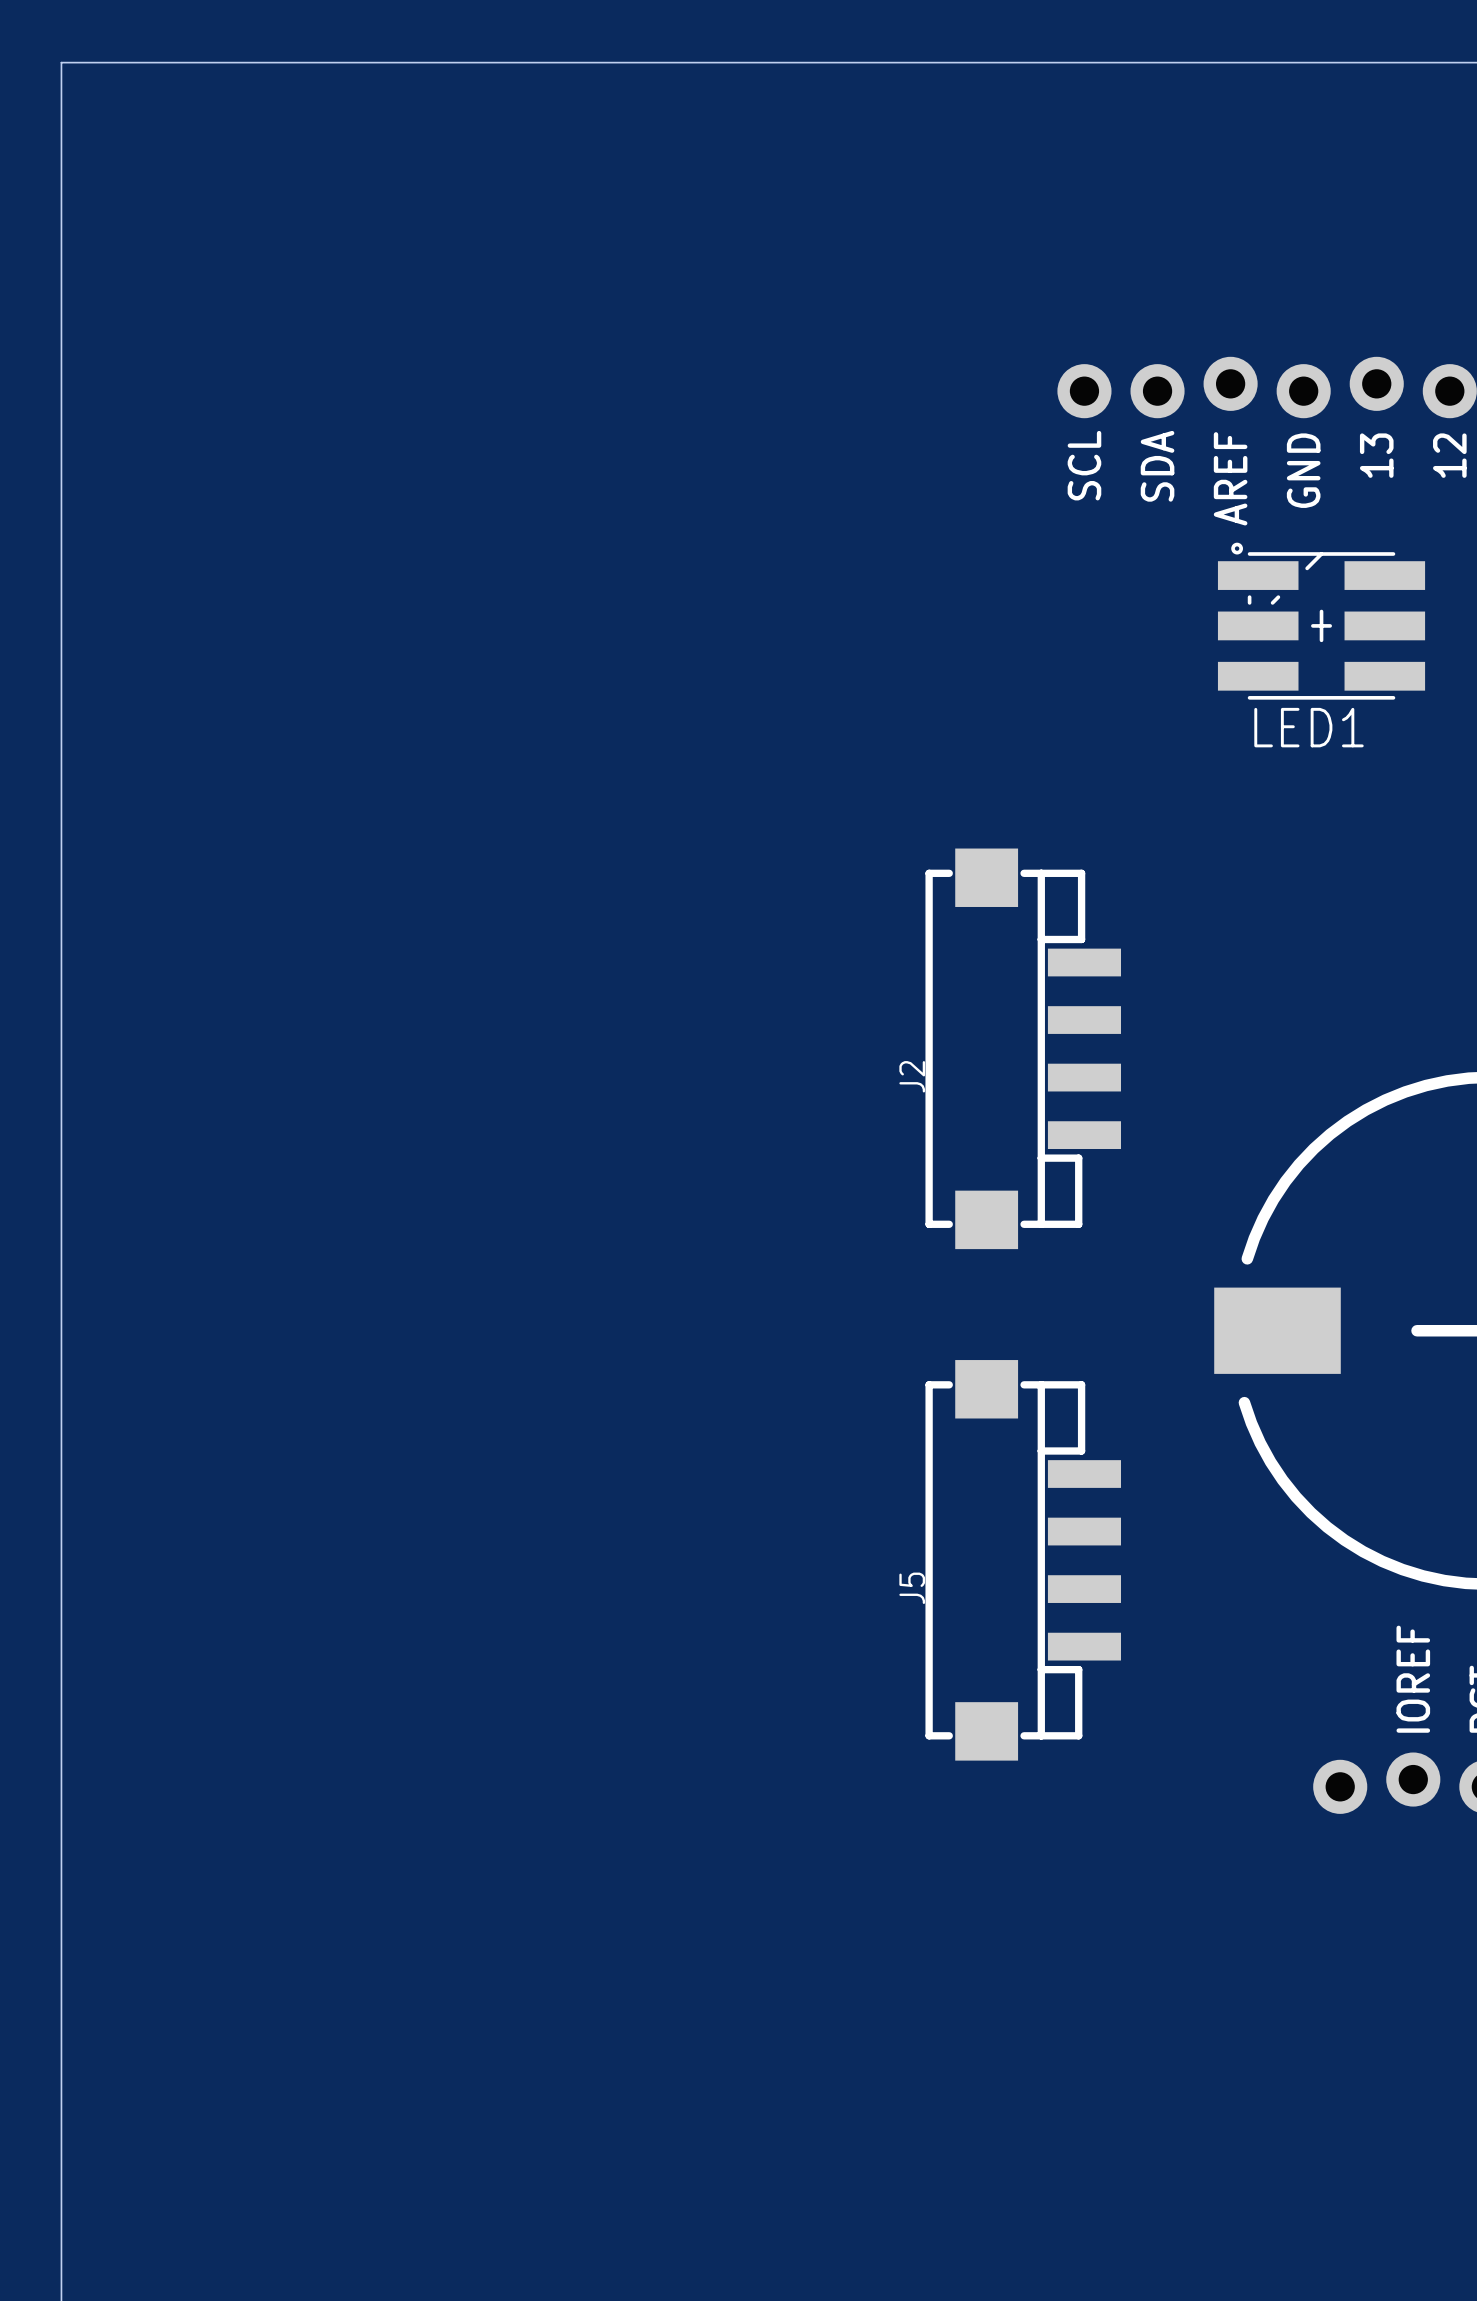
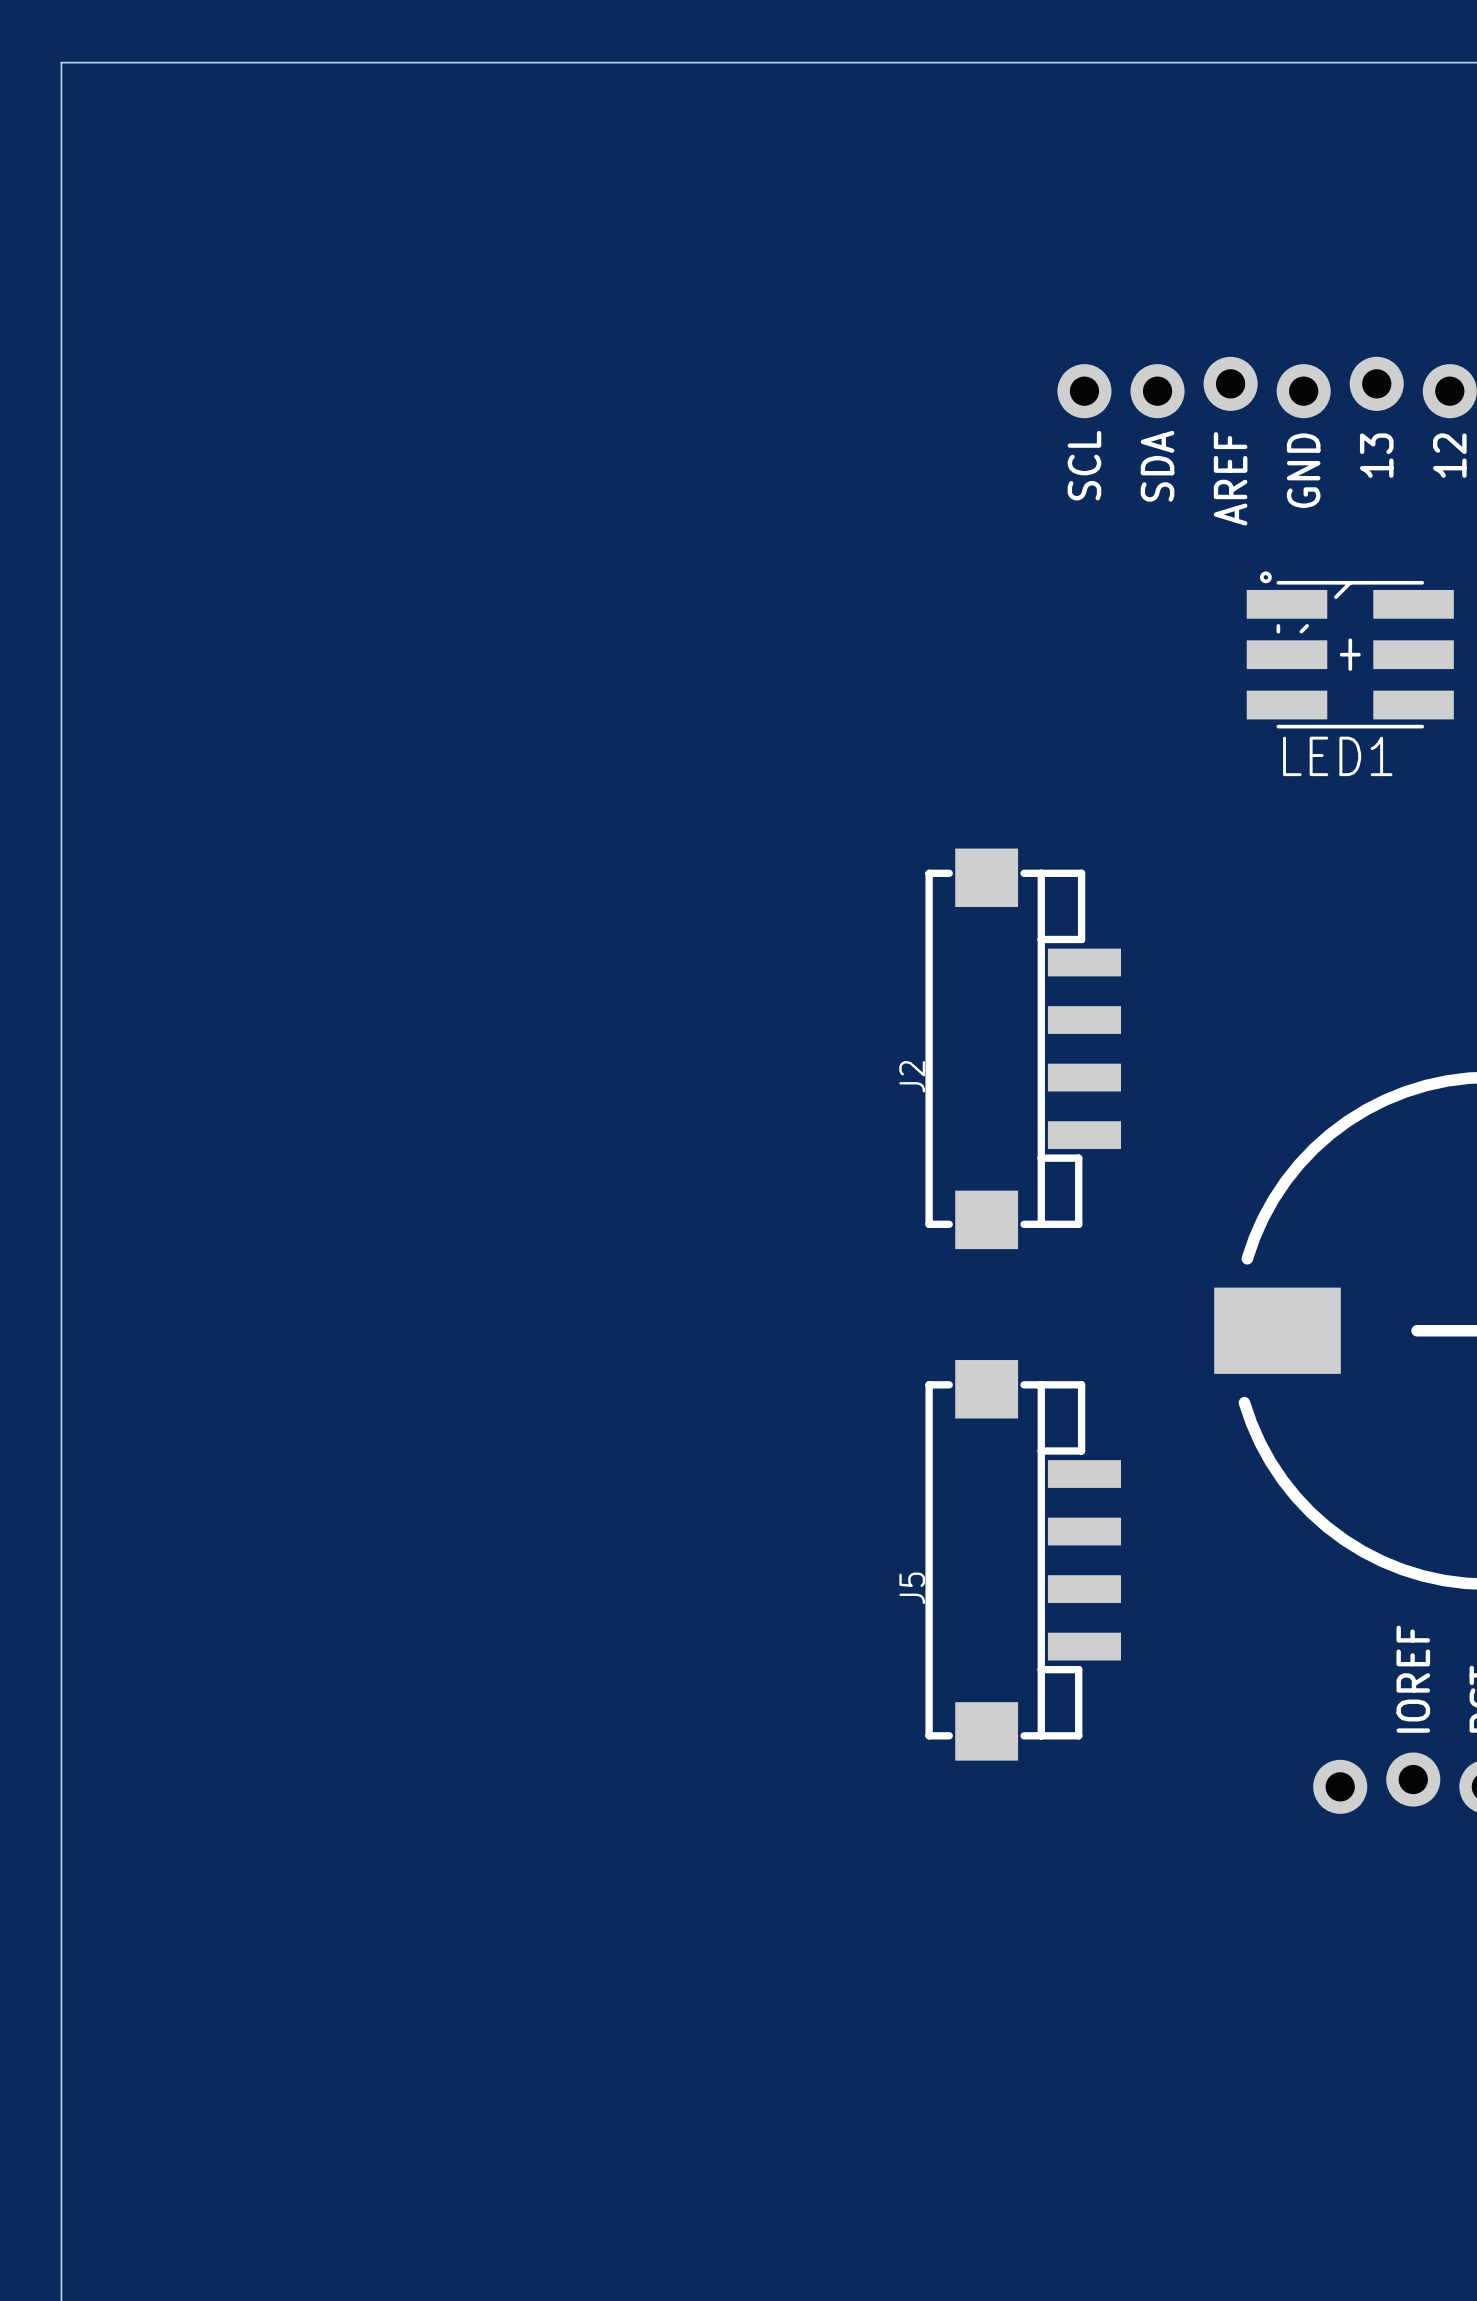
LED1 position: (1321, 621) -> (1350, 649)

